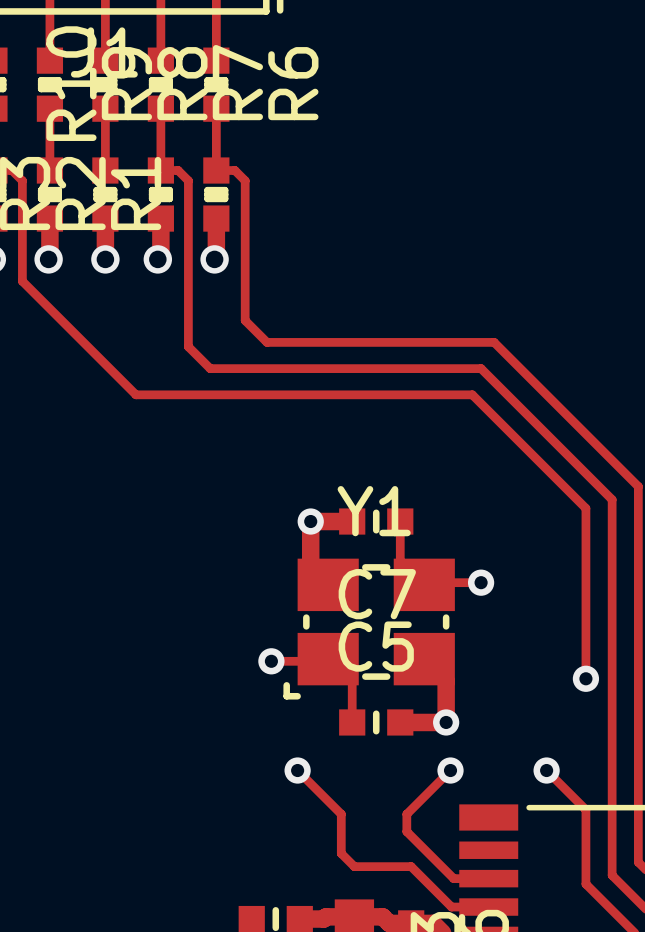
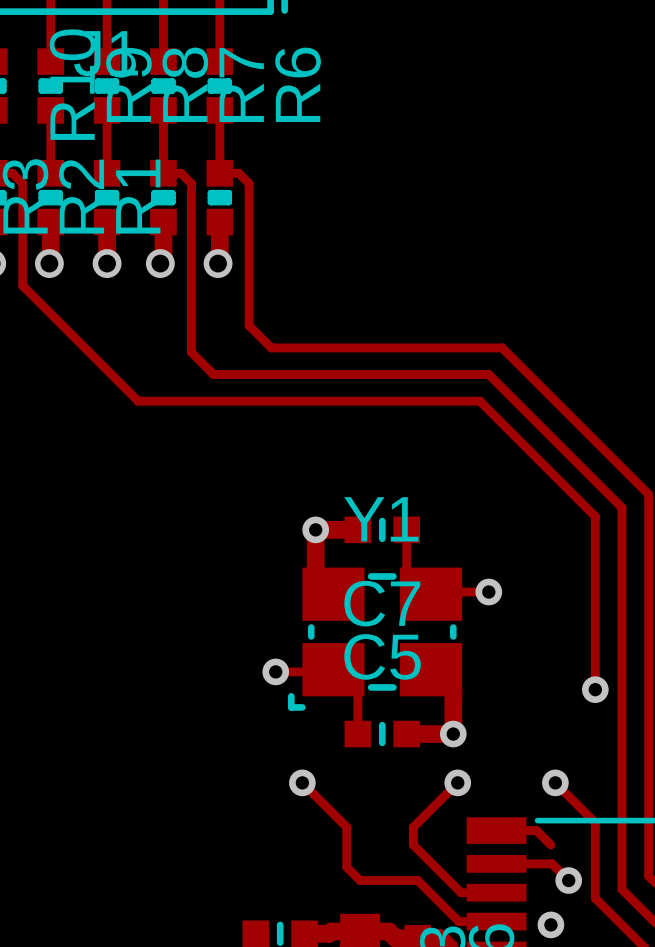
track: none -> (497, 831) (496, 830) (536, 830) (550, 845)
track: none -> (496, 863) (552, 863) (568, 880)
via: none -> (568, 880)
via: none -> (550, 924)

